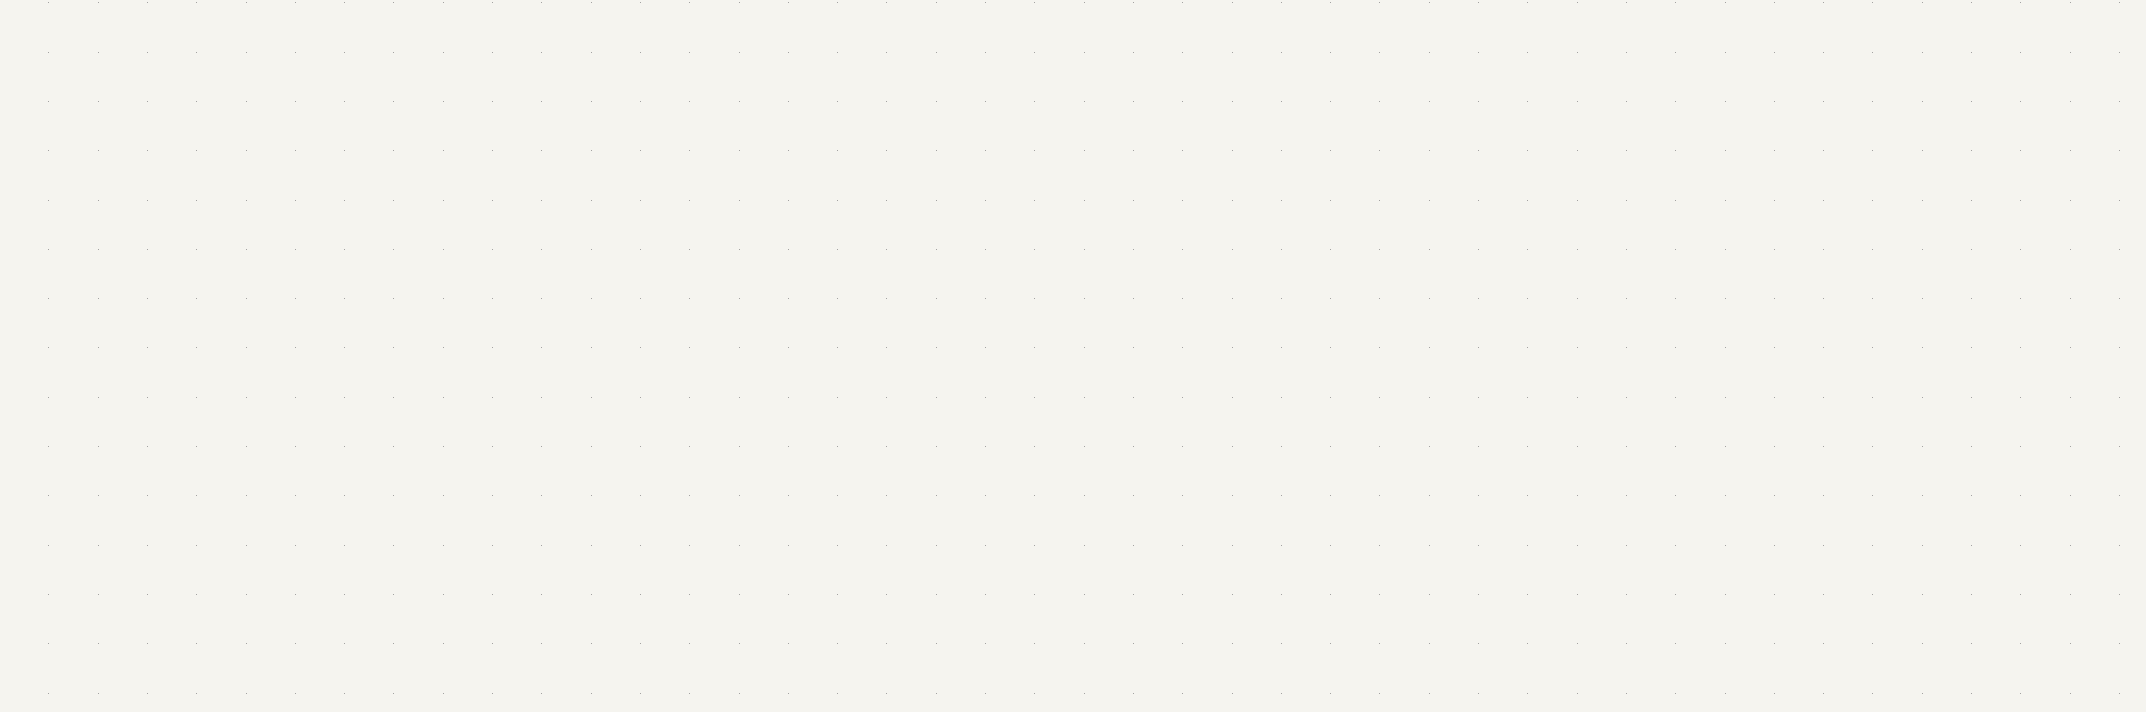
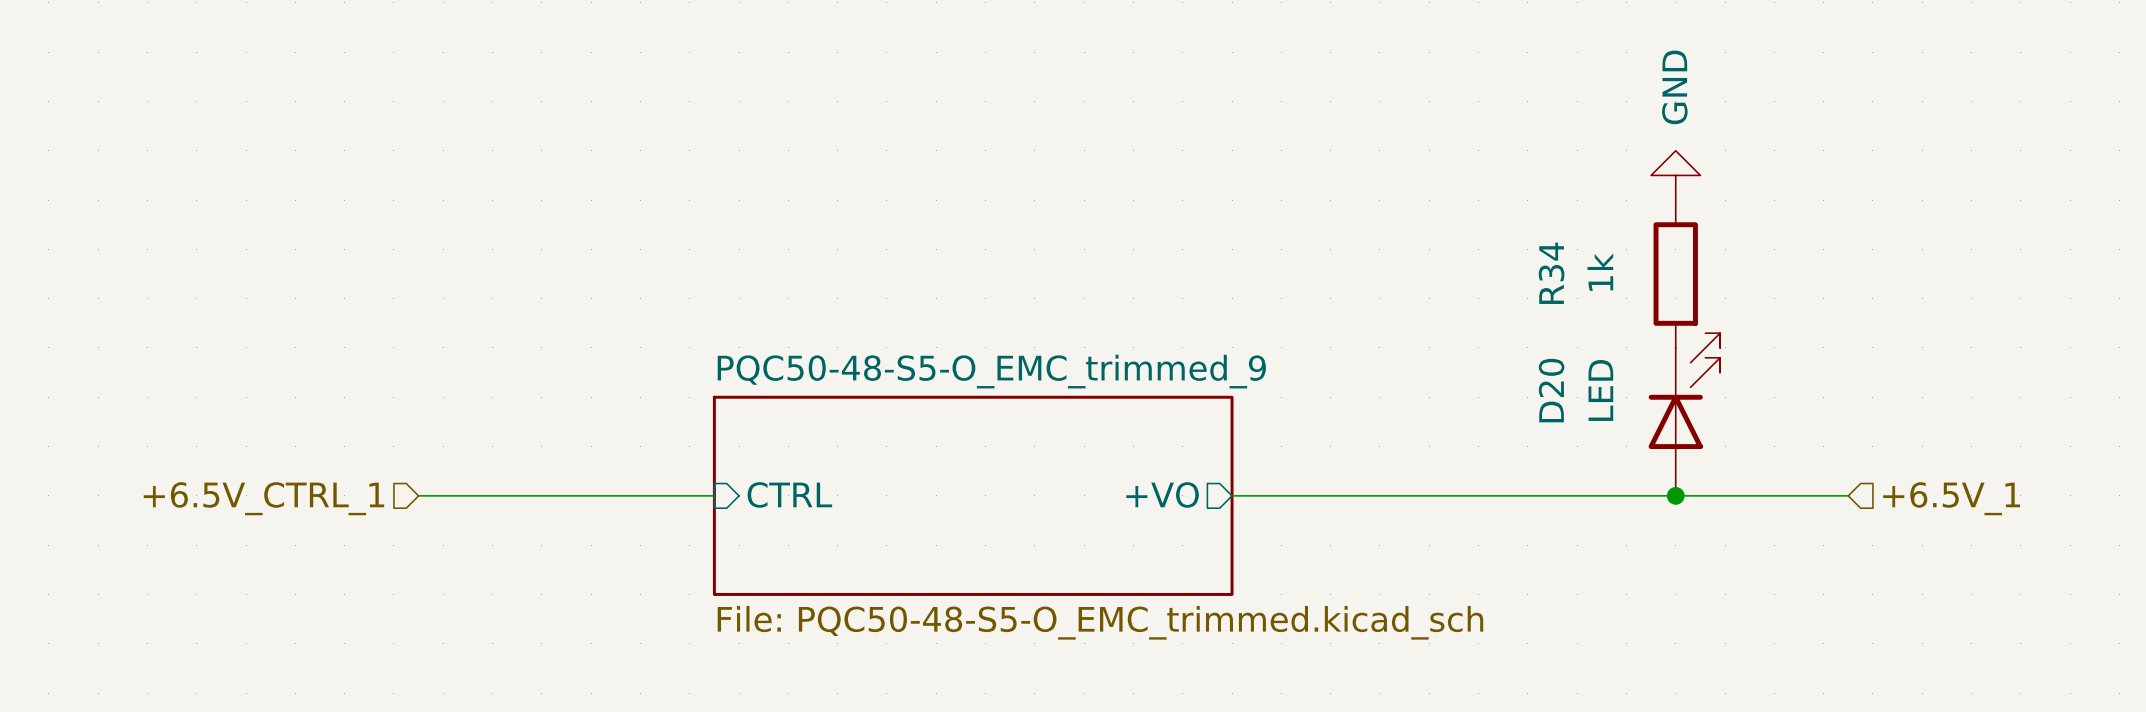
power symbol: none -> GND (1675, 175)
R34: none -> 1k (1675, 274)
D20: none -> LED (1684, 414)
sheet pin: none -> CTRL (789, 494)
sheet pin: none -> +VO (1162, 494)
wire: none -> (418, 495) (714, 495)
sheet PQC50-48-S5-O_EMC_trimmed_9: none -> File: PQC50-48-S5-O_EMC_trimmed.kicad_sch (973, 495)
wire: none -> (1232, 495) (1848, 495)
junction: none -> (1675, 495)
hierarchical label: none -> +6.5V_CTRL_1 (263, 498)
hierarchical label: none -> +6.5V_1 (1951, 498)

